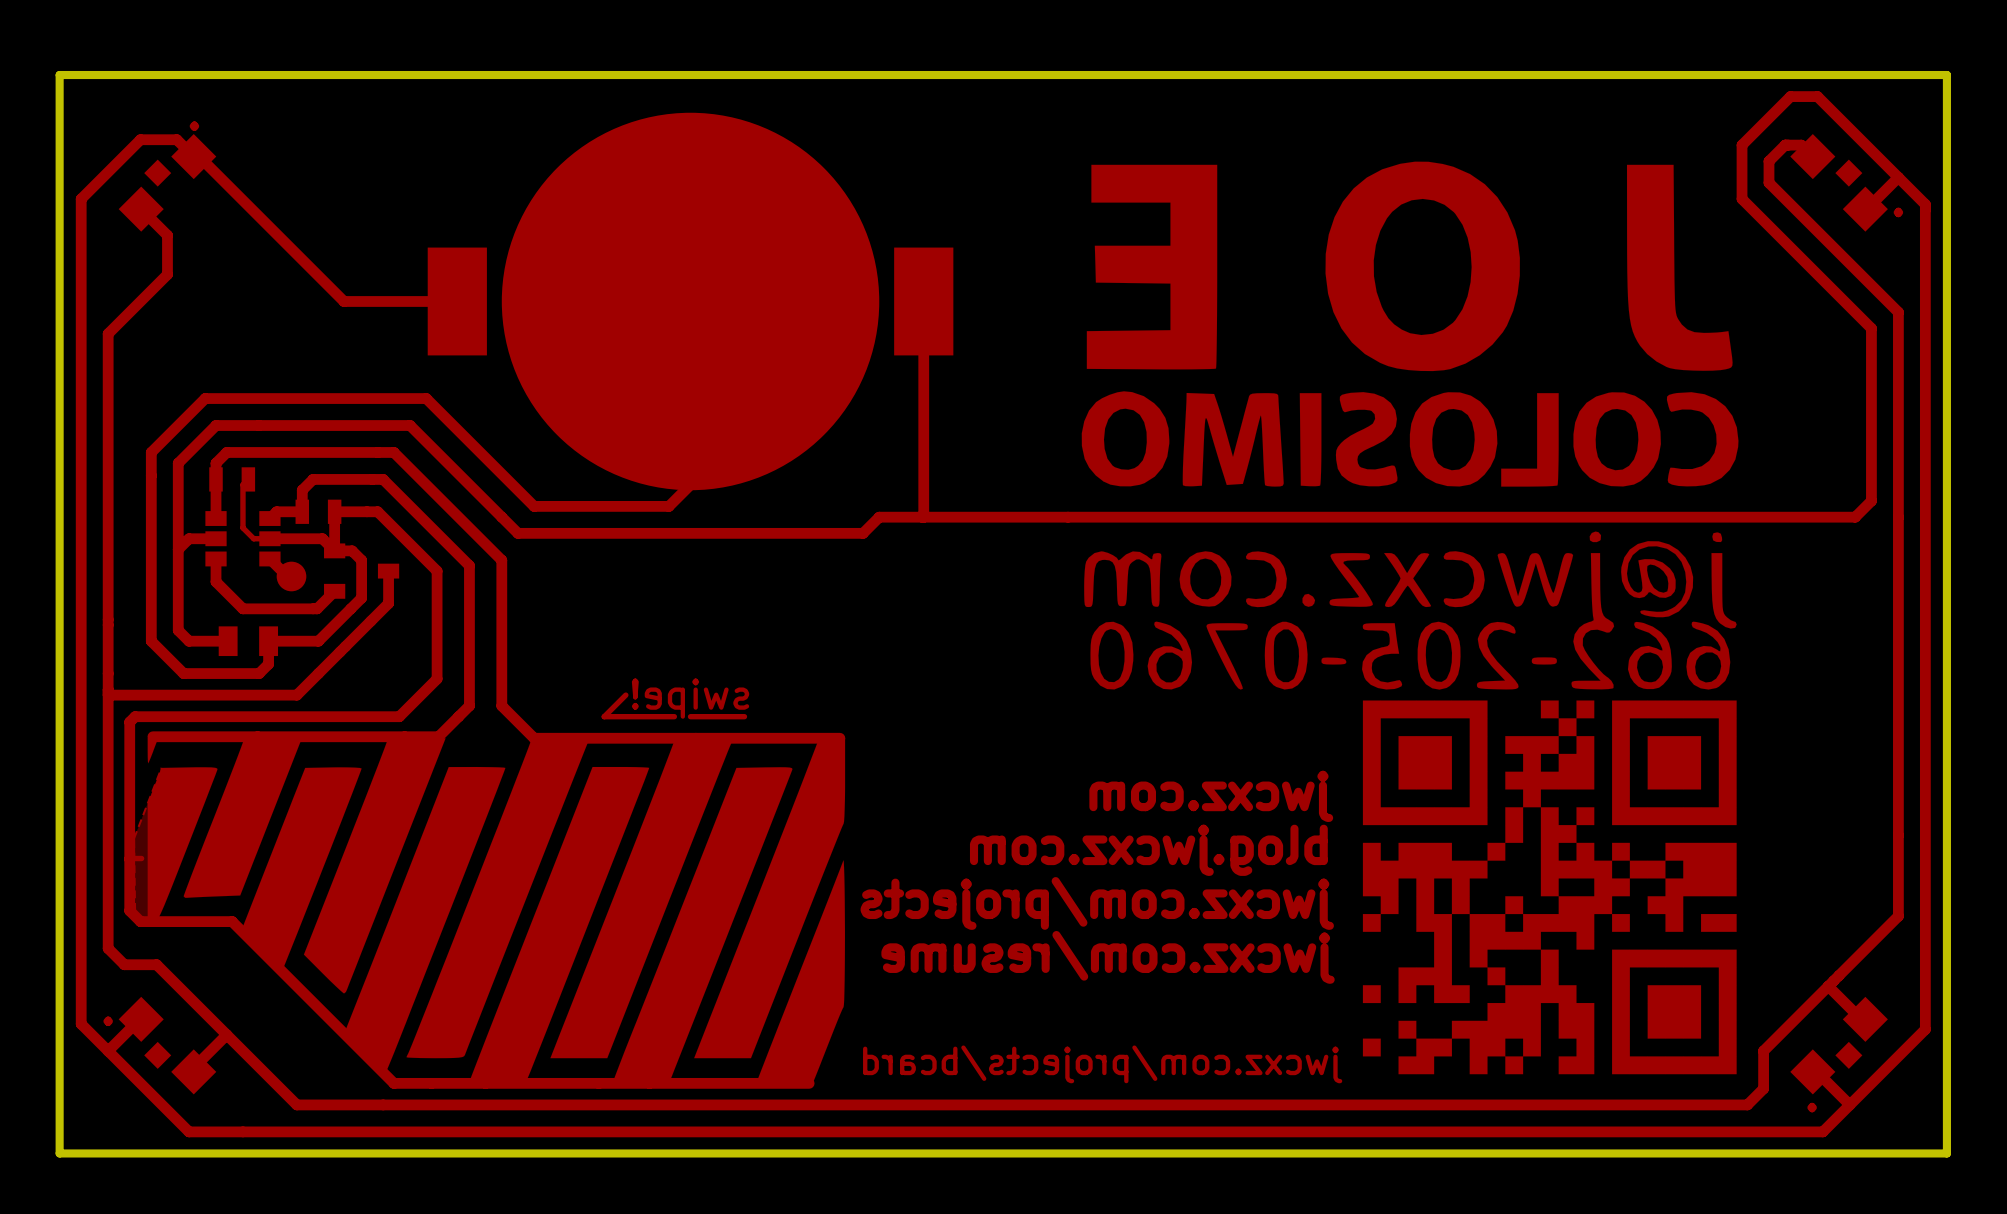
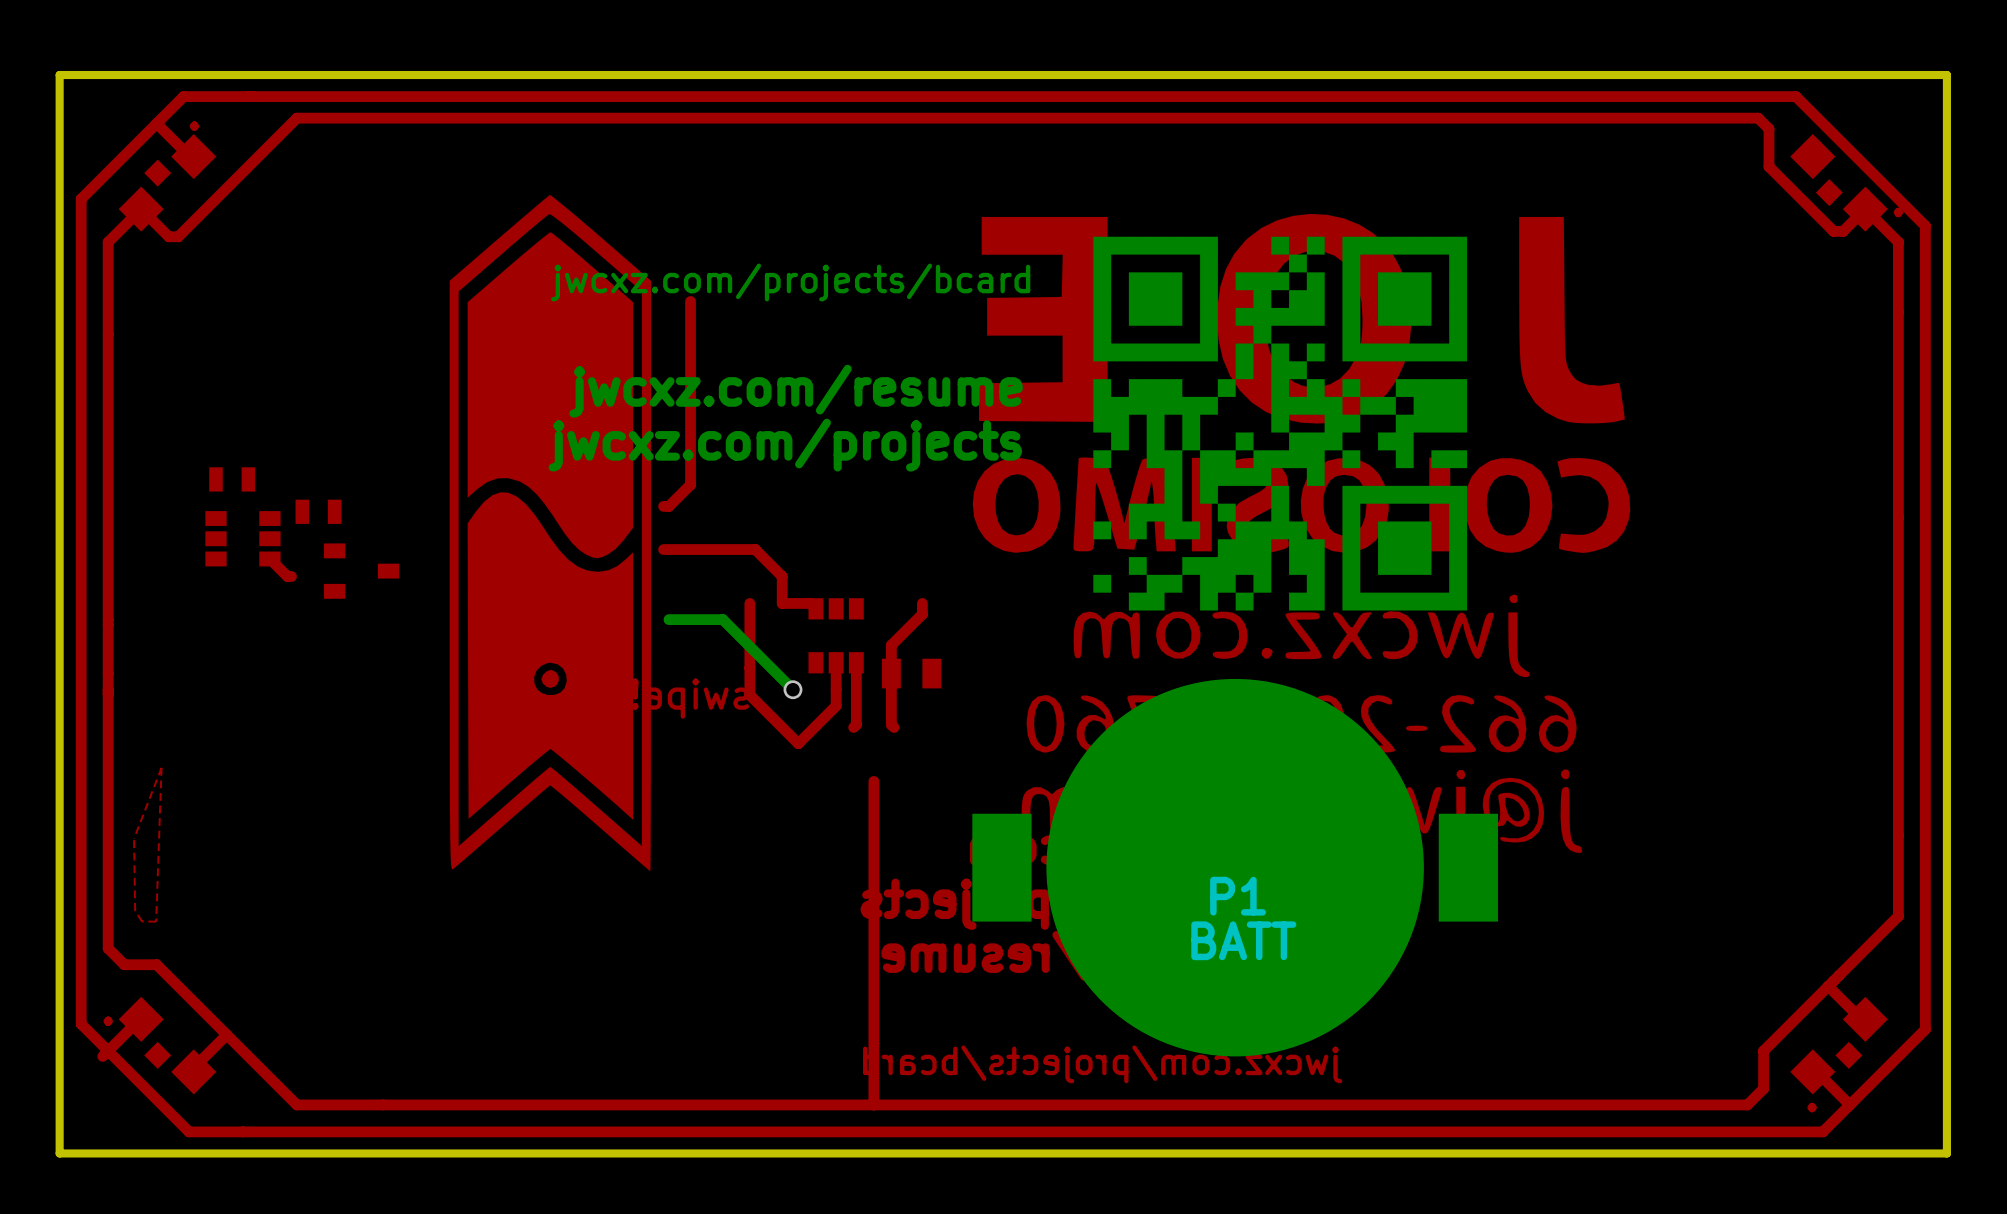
top track: (1790, 96) (1742, 145) (1742, 199) (1871, 328) (1871, 501) (1855, 517) (879, 517) (863, 533) (517, 533) (410, 425) (216, 425) (178, 463) (178, 630) (189, 641) (228, 641) -> (1790, 96) (183, 96) (140, 139)
top track: (1795, 96) (1817, 96) (1925, 204) (1925, 225) -> (1795, 96) (1925, 225)
top track: none -> (156, 123) (189, 156) (193, 156)
top track: (140, 139) (176, 139) (193, 156) (199, 156) (344, 301) (457, 301) -> none
drawing: [1081, 161, 1739, 1075] -> none
top track: (1768, 161) (1785, 145) (1801, 145) (1818, 161) -> (1768, 161) (1768, 128) (1758, 118) (296, 118) (178, 236) (167, 235)
top track: (1768, 166) (1768, 182) (1898, 312) -> (1768, 166) (1833, 231) (1843, 231) (1865, 209) (1898, 242) (1898, 312)
top track: (1898, 177) (1865, 209) -> none
part rotation: 0° (1839, 182) -> 180° (1839, 182)
drawing: none -> [449, 194, 1631, 872]
top track: (167, 235) (167, 274) (108, 333) -> (141, 209) (108, 242) (108, 333)
text: none -> jwcxz.com/projects/bcard (790, 282)
part: (690, 301) -> none
top track: (923, 301) (923, 517) -> none
text: none -> jwcxz.com/resume (796, 391)
text: none -> jwcxz.com/projects (785, 445)
top track: (248, 479) (242, 484) (242, 527) (253, 538) (322, 538) (334, 550) -> none
top track: (663, 506) (534, 506) (426, 398) (205, 398) (151, 452) (151, 641) (183, 673) (259, 673) (268, 664) (268, 641) (318, 641) (361, 598) (361, 560) (352, 550) (334, 550) -> none
top track: (216, 518) (216, 463) (226, 452) (393, 452) (501, 560) (501, 705) (534, 738) (839, 738) -> none
top track: (269, 518) (276, 511) (302, 511) (302, 490) (313, 479) (383, 479) (469, 565) (469, 705) (438, 736) (152, 736) -> none
top track: (216, 538) (189, 538) (178, 549) -> none
top track: none -> (663, 549) (755, 549) (782, 576) (782, 603) (810, 603) (815, 608)
top track: (334, 550) (334, 511) (377, 511) (437, 571) (437, 678) (399, 716) (135, 716) (129, 722) (129, 910) (140, 921) (232, 921) (393, 1083) (809, 1083) -> none
top track: (216, 558) (216, 581) (242, 608) (317, 608) (334, 591) -> none
top track: (388, 571) (388, 603) (296, 695) (108, 695) -> none
part: (291, 576) -> none
top track: none -> (749, 603) (749, 695) (798, 743) (836, 705) (836, 662)
top track: none -> (922, 603) (922, 614) (891, 645) (891, 724) (894, 727)
bottom track: none -> (668, 619) (722, 619) (792, 689)
part: none -> (836, 635)
part: (248, 641) -> none
top track: none -> (856, 662) (856, 724) (853, 727)
part: none -> (911, 673)
via: none -> (792, 689)
top track: (625, 695) (604, 716) (674, 716) -> none
top track: (744, 716) (690, 716) -> none
top track: none -> (873, 781) (873, 1104)
top track: (141, 858) (129, 859) -> none
P1: none -> BATT (1235, 867)
part: (496, 910) -> none
top track: none -> (108, 1051) (102, 1056)

